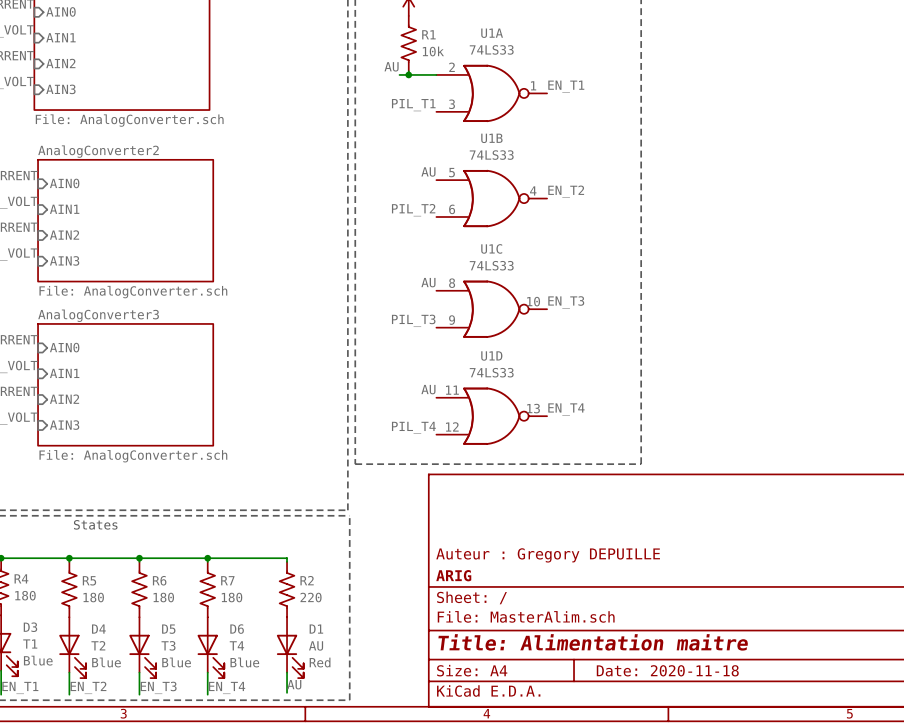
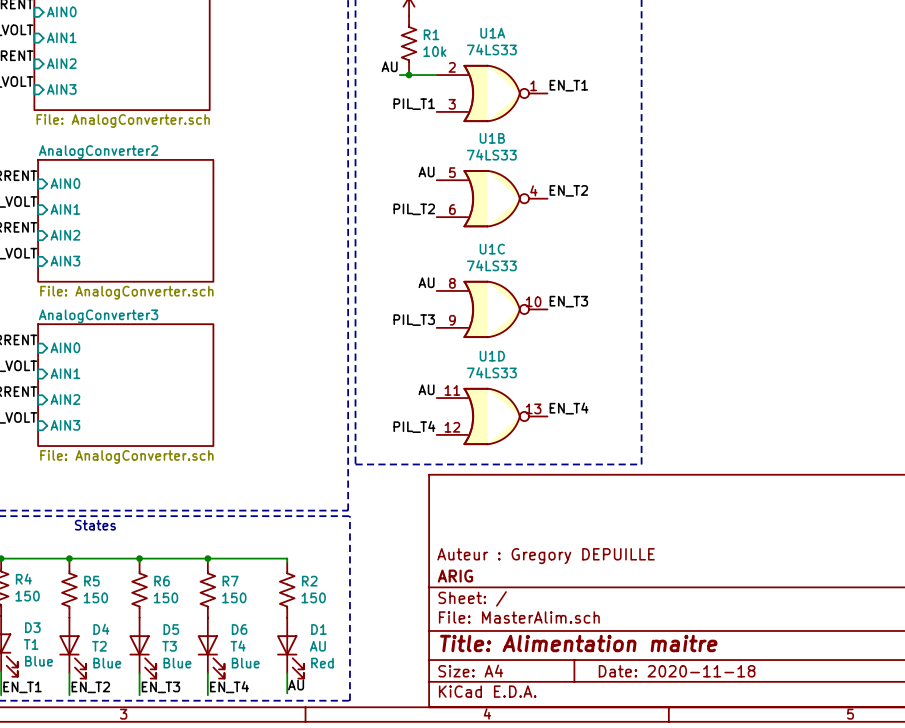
R4 value: 180 (25, 595) -> 150 (27, 596)
R5 value: 180 (93, 597) -> 150 (95, 597)
R6 value: 180 (163, 597) -> 150 (166, 597)
R7 value: 180 (232, 597) -> 150 (234, 597)
R2 value: 220 (311, 597) -> 150 (313, 597)

